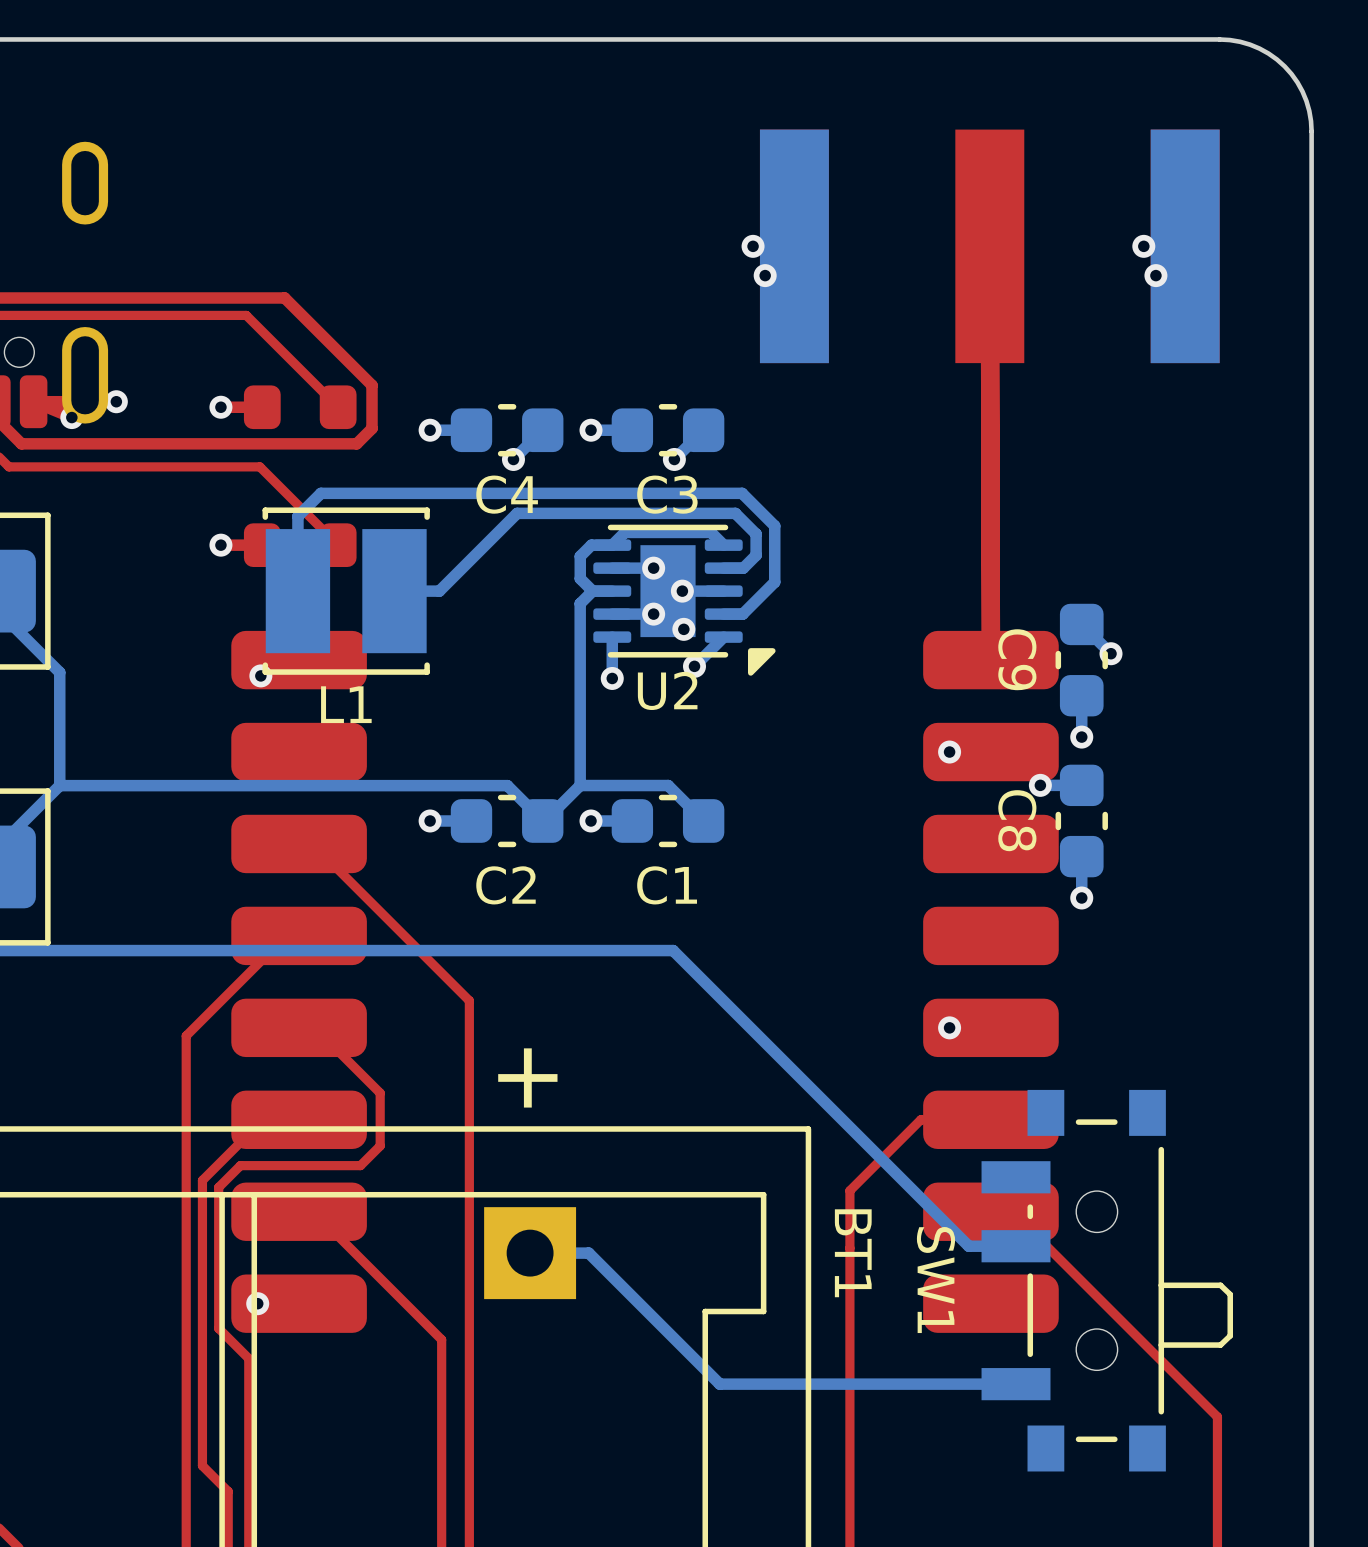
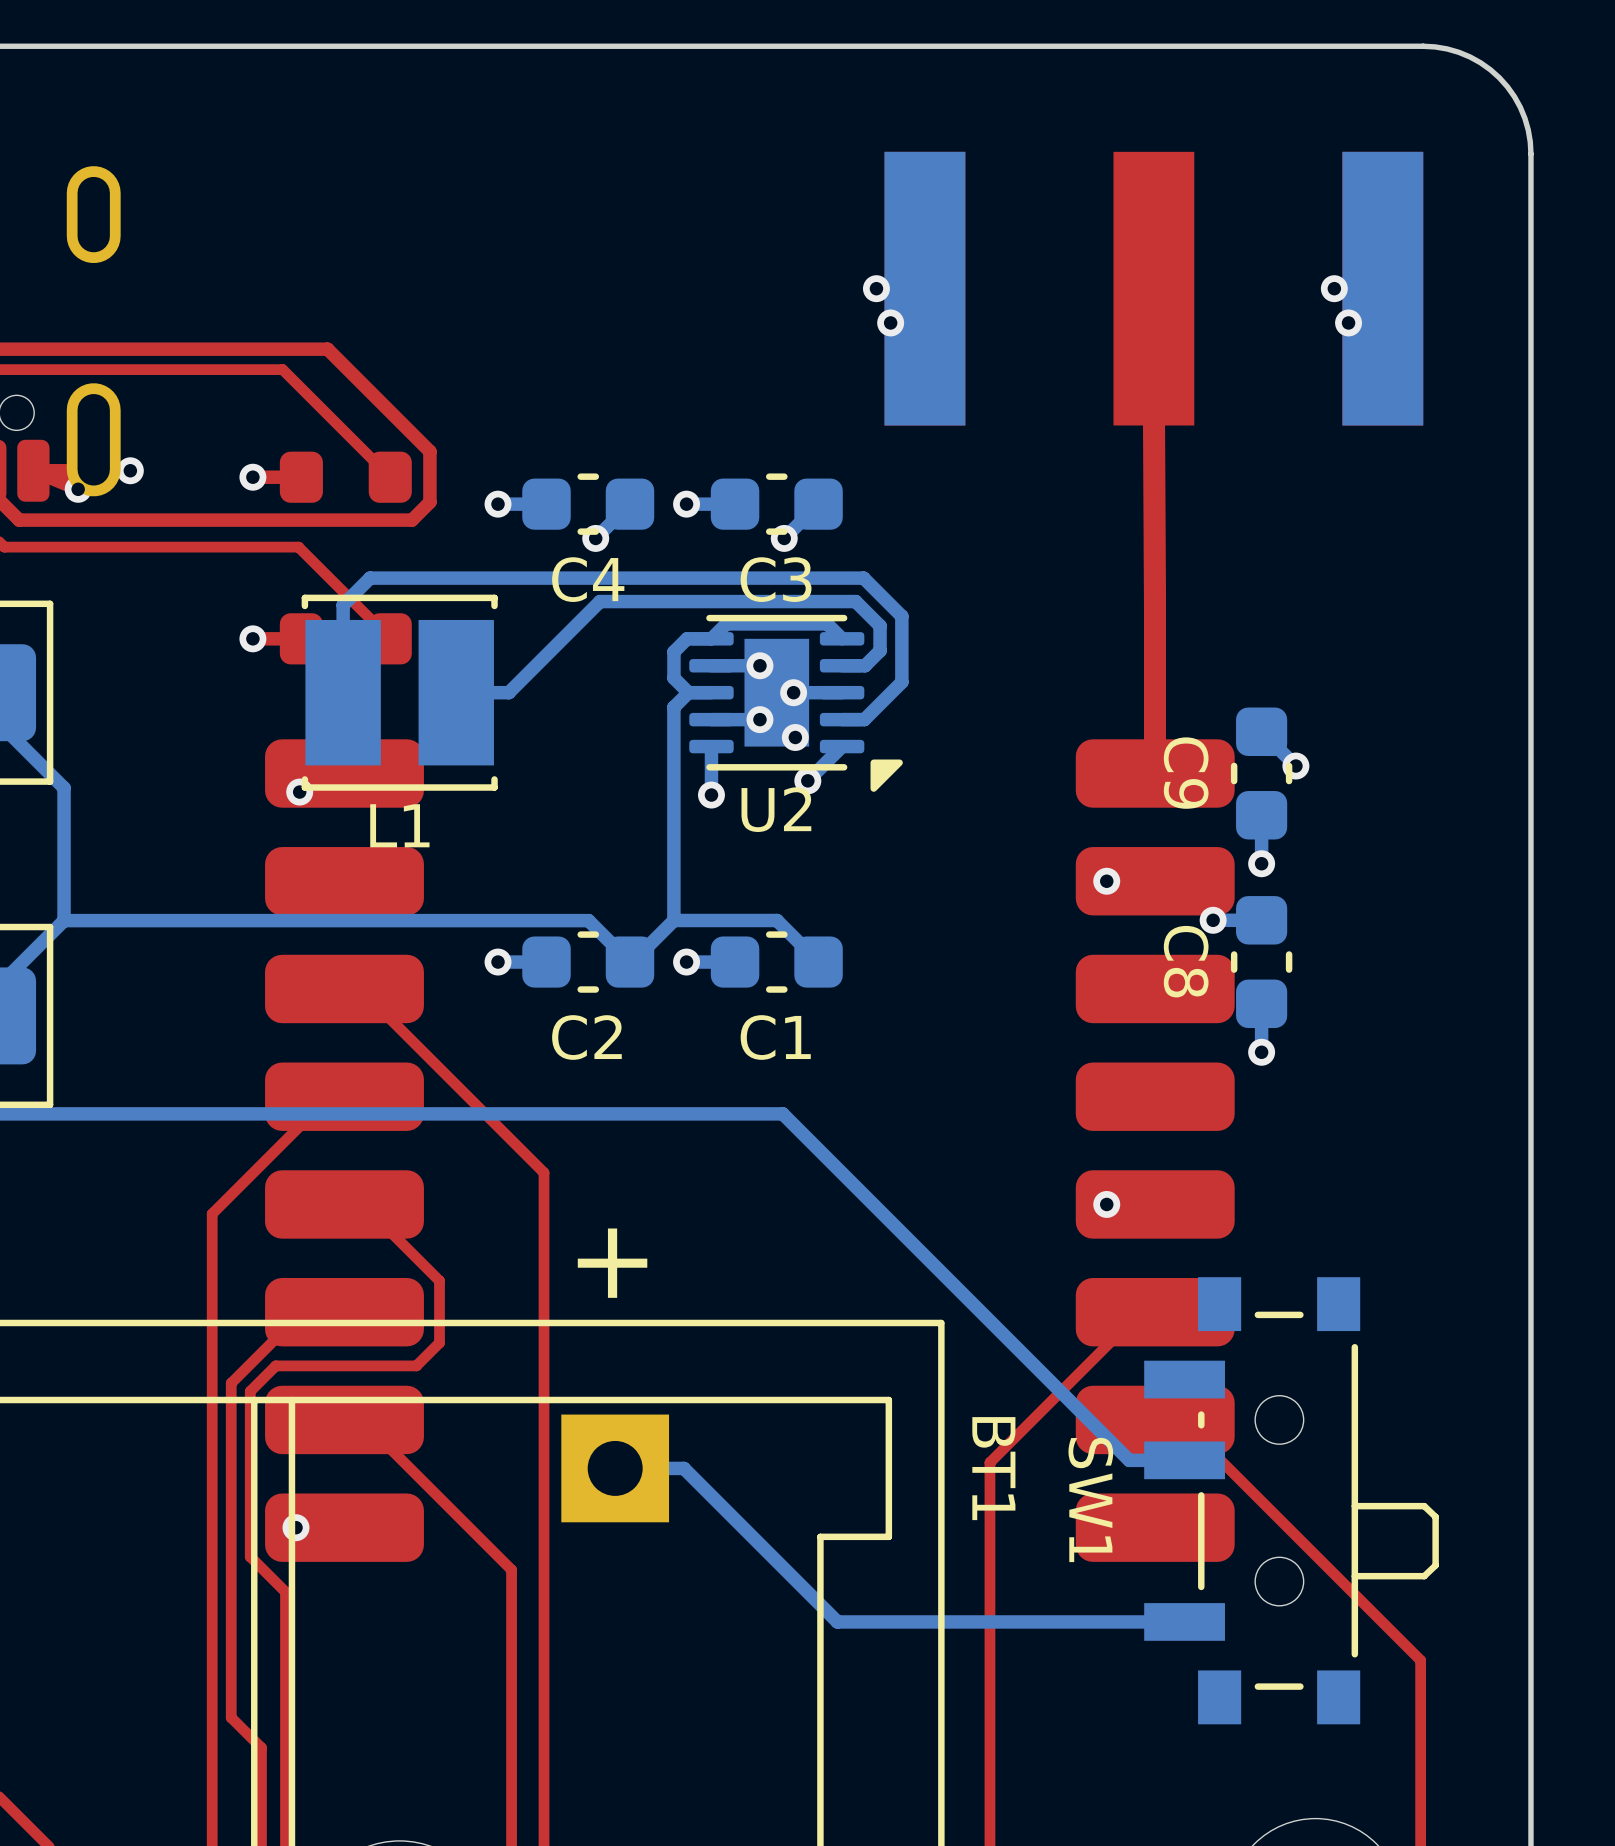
top track: (978, 1119) (920, 1119) (849, 1190) (849, 1248) -> (1140, 1312) (989, 1462)

